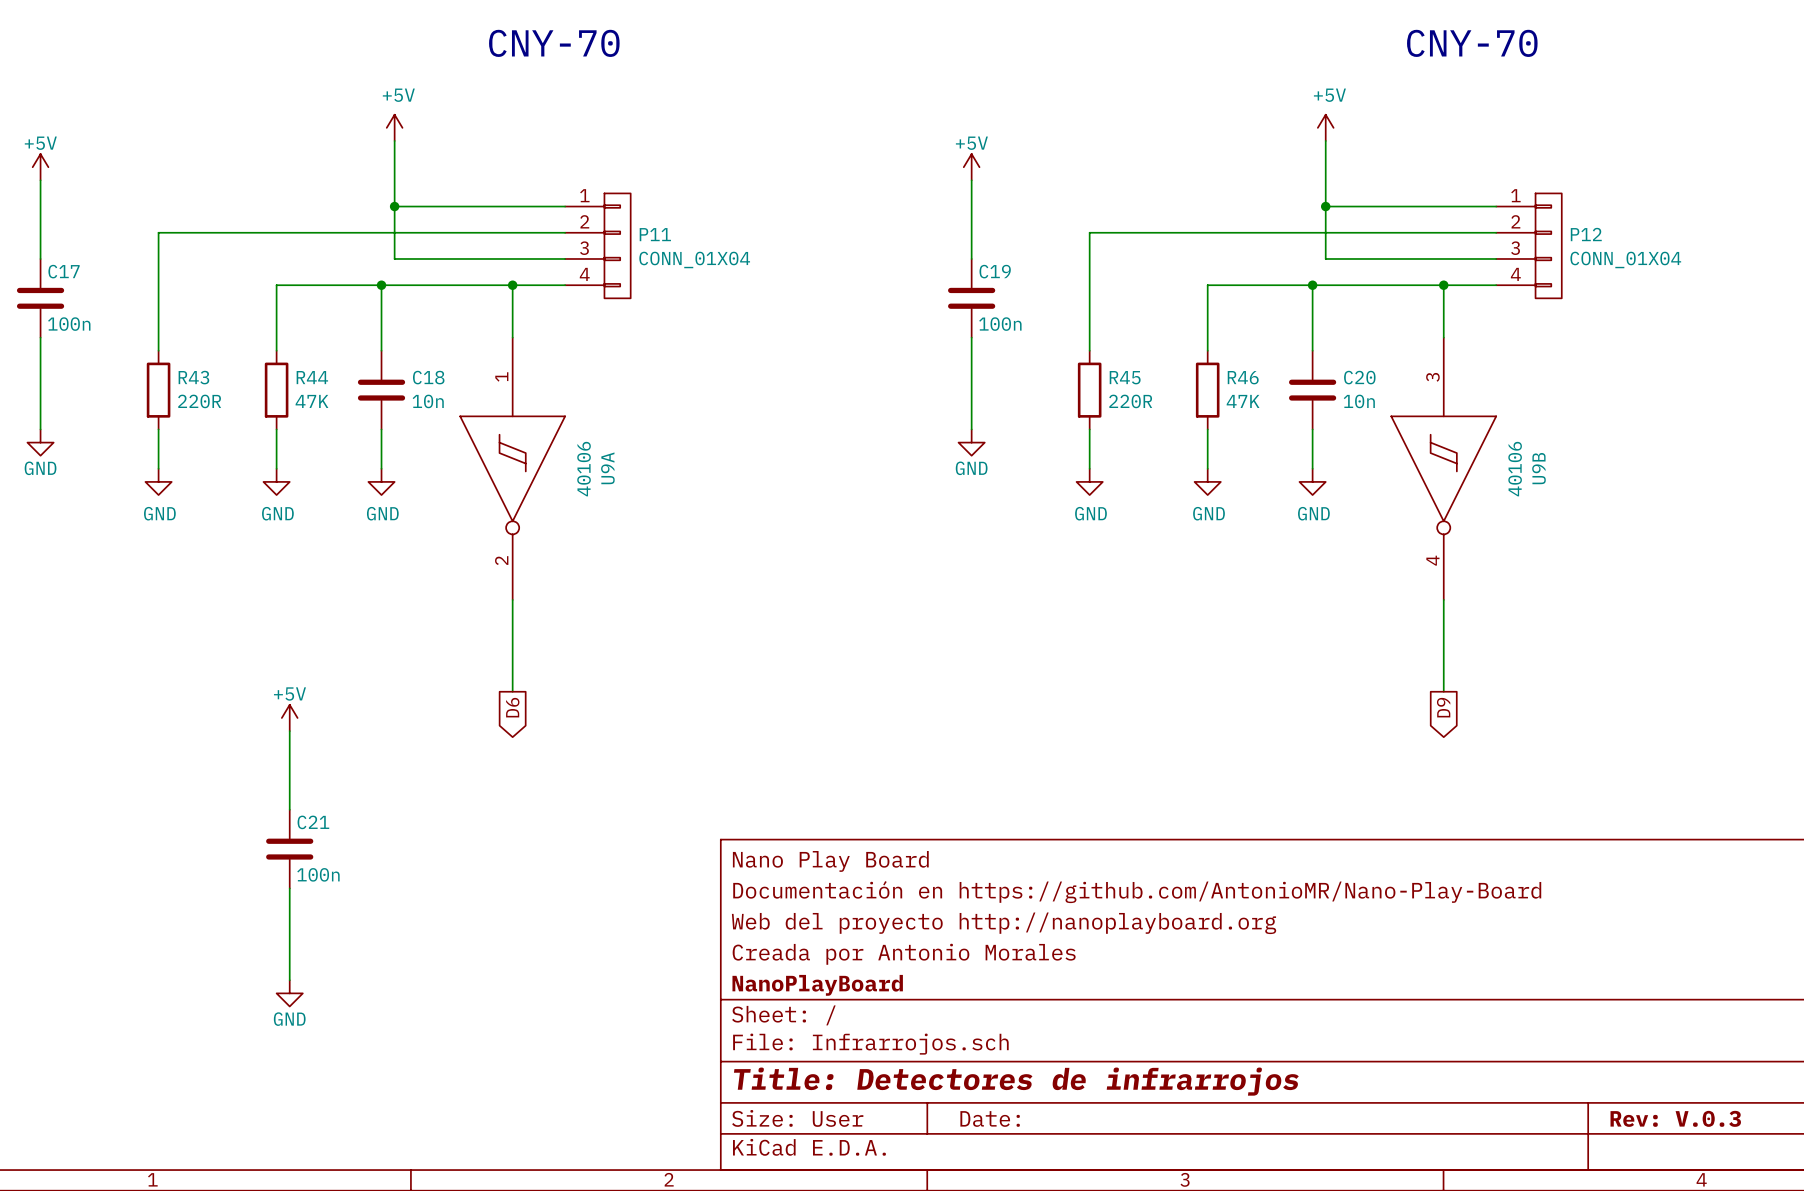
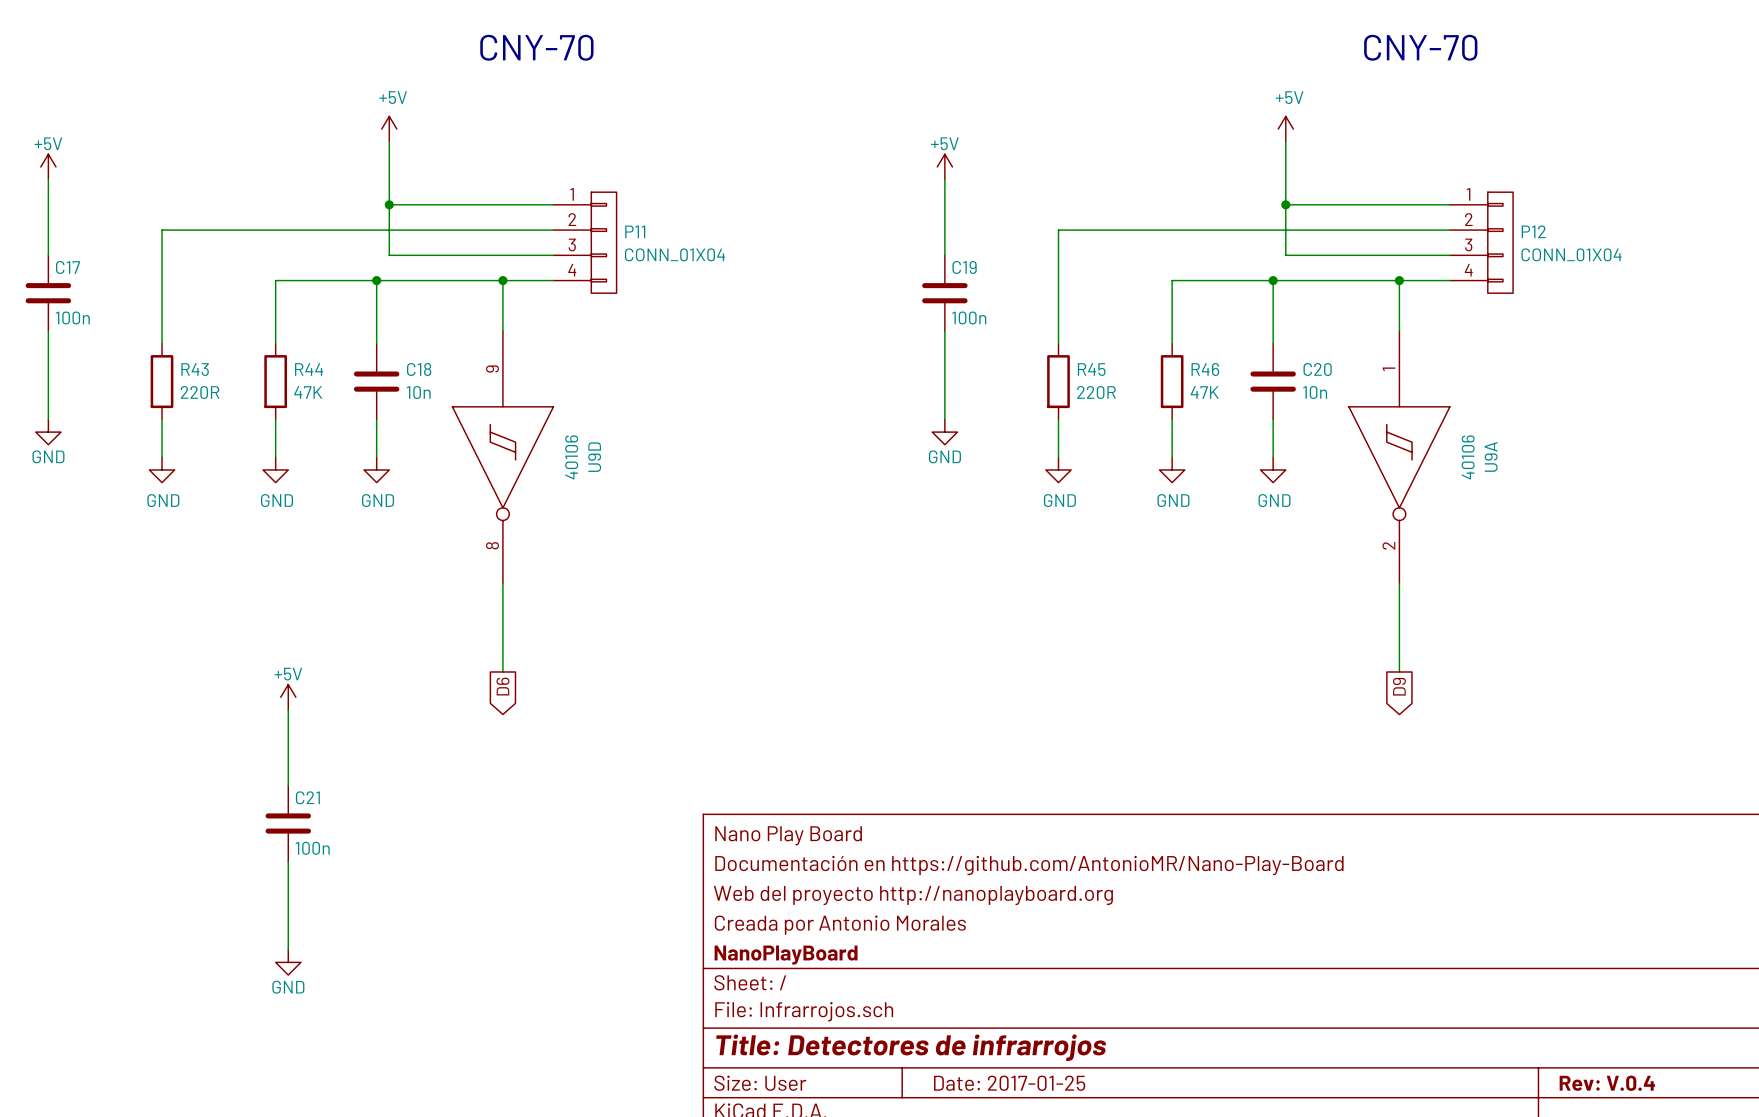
U9A position: (512, 468) -> (1399, 457)
U9D: none -> 40106 (502, 457)
U9B: 40106 (1443, 468) -> none
title block: Date: (990, 1118) -> Date: 2017-01-25 (1009, 1083)
title block: Rev: V.0.3 (1675, 1118) -> Rev: V.0.4 (1607, 1083)

